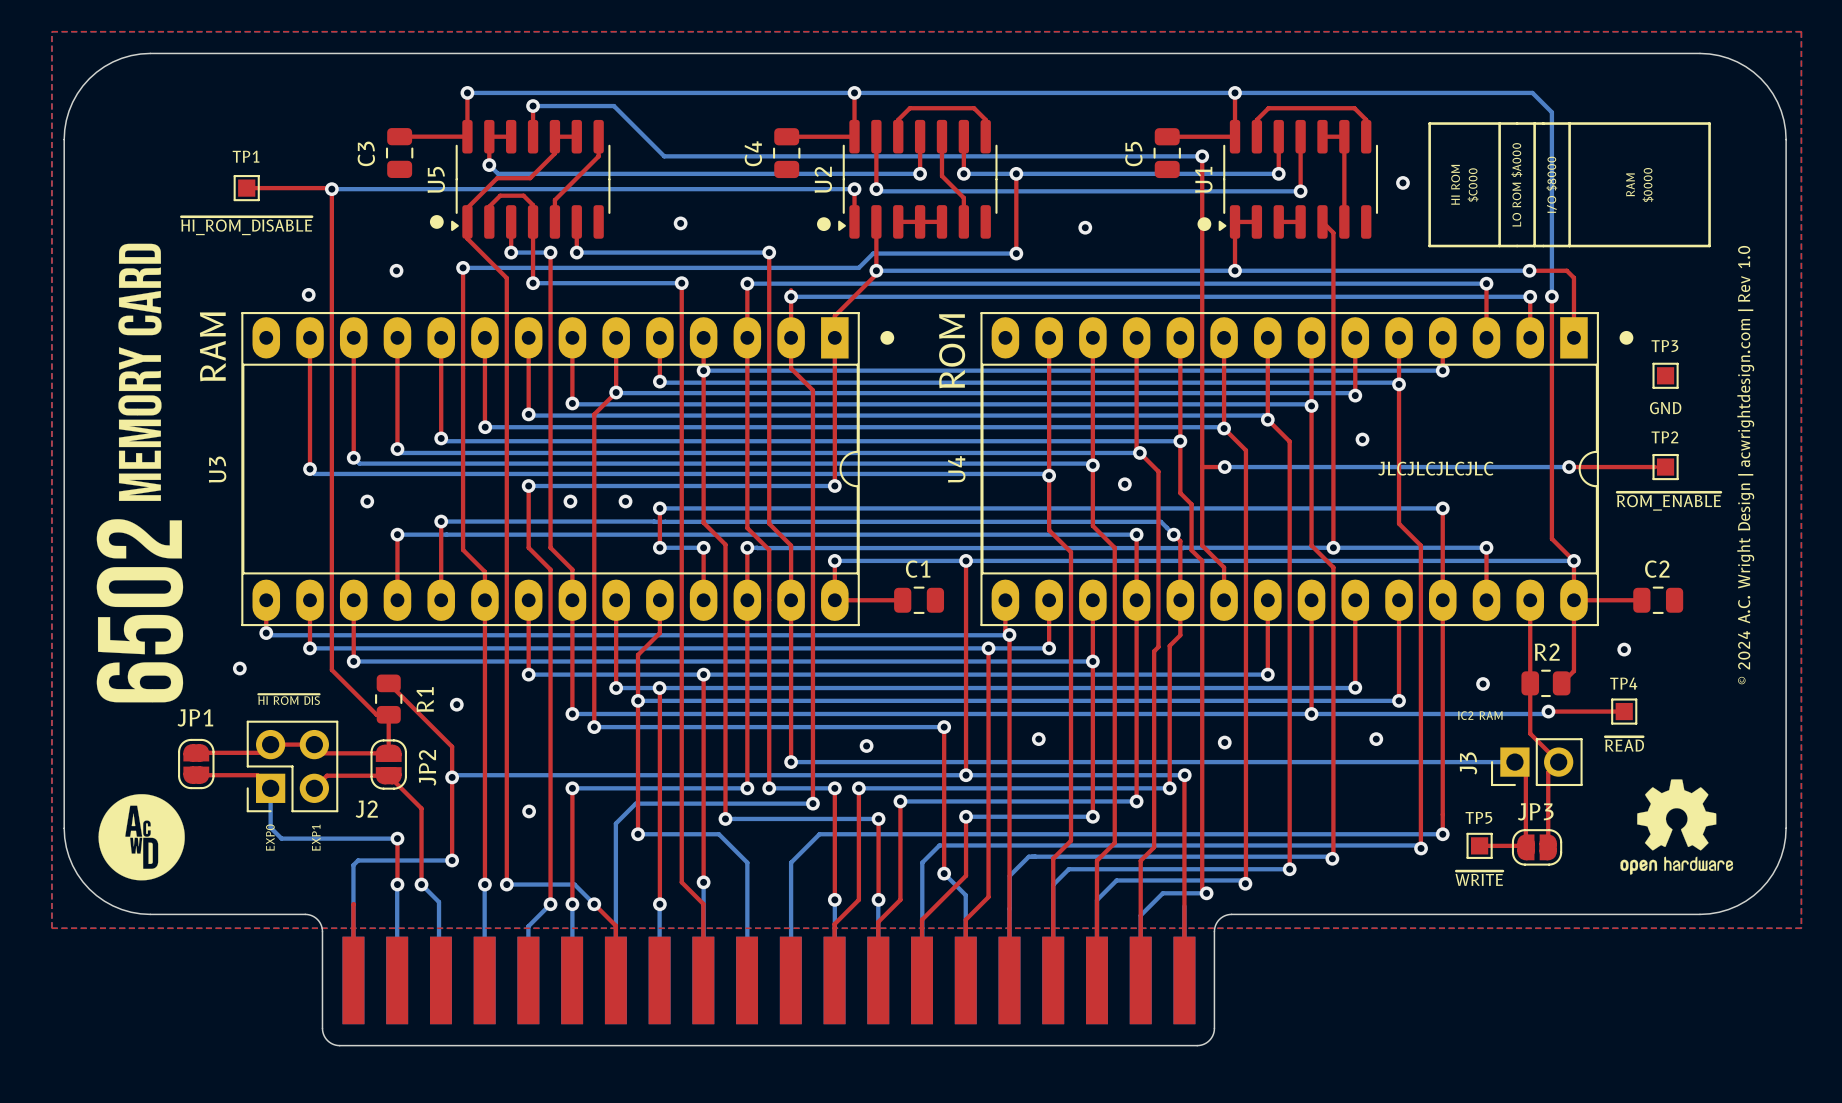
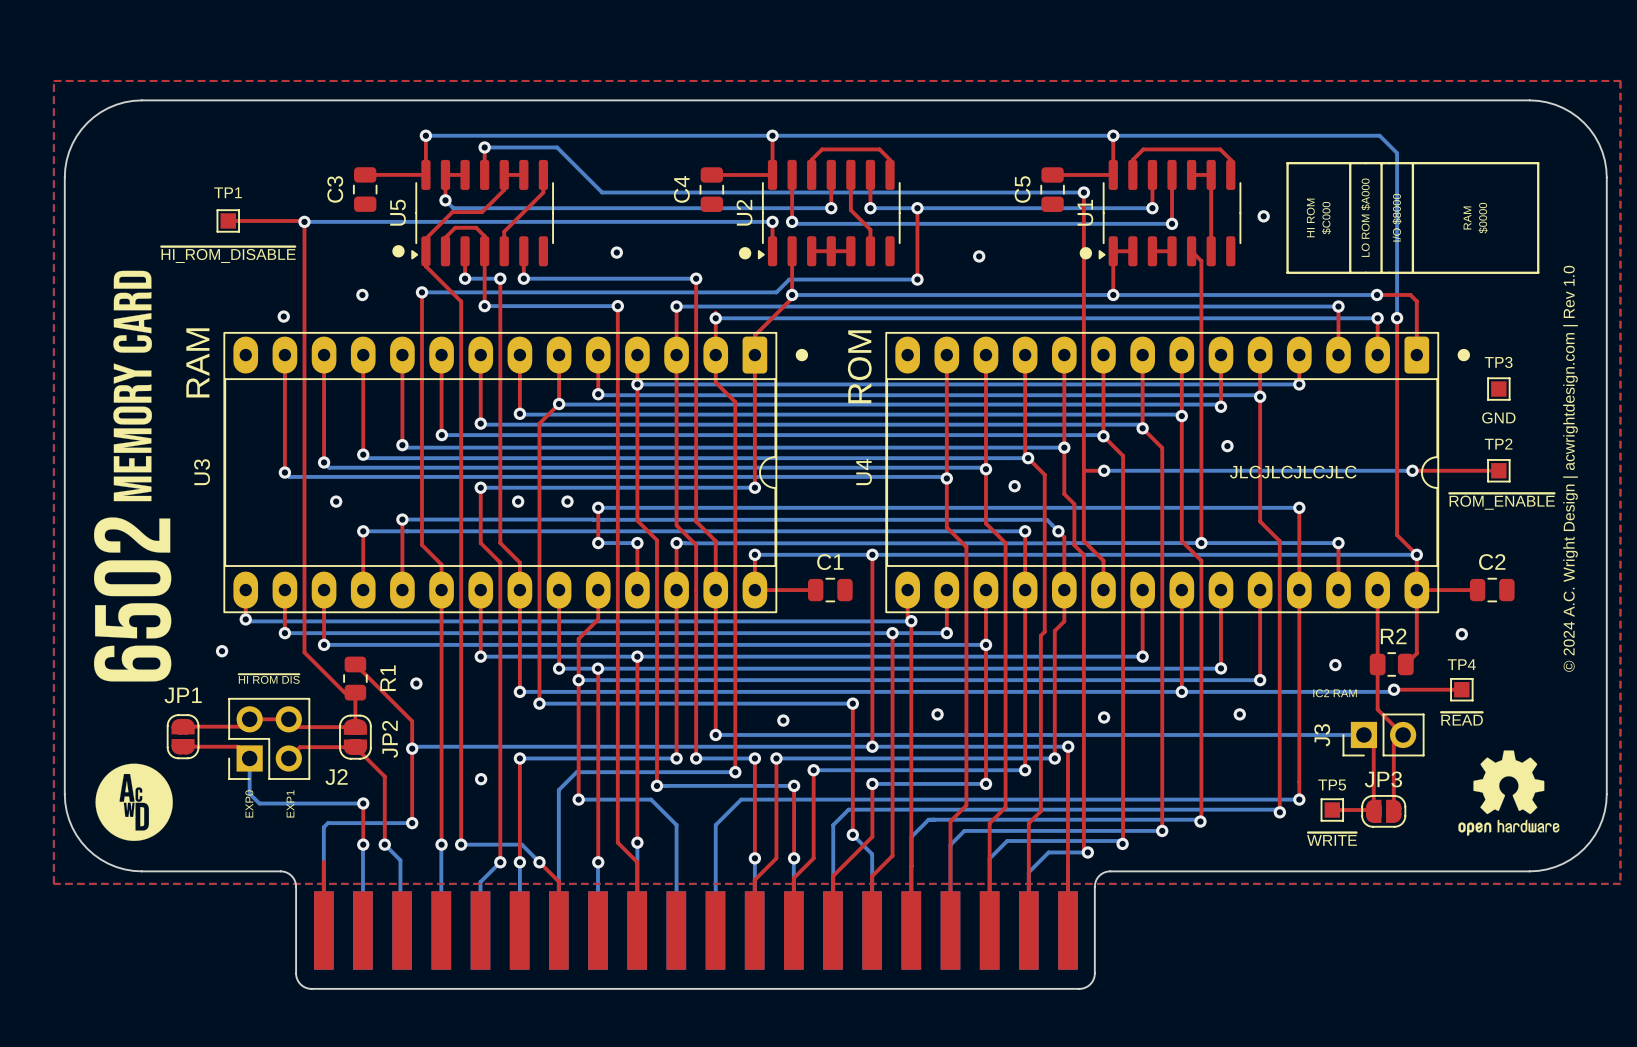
U3 footprint: [241, 312, 860, 627] -> [223, 331, 778, 614]
U4 footprint: [980, 312, 1599, 627] -> [885, 331, 1440, 614]

